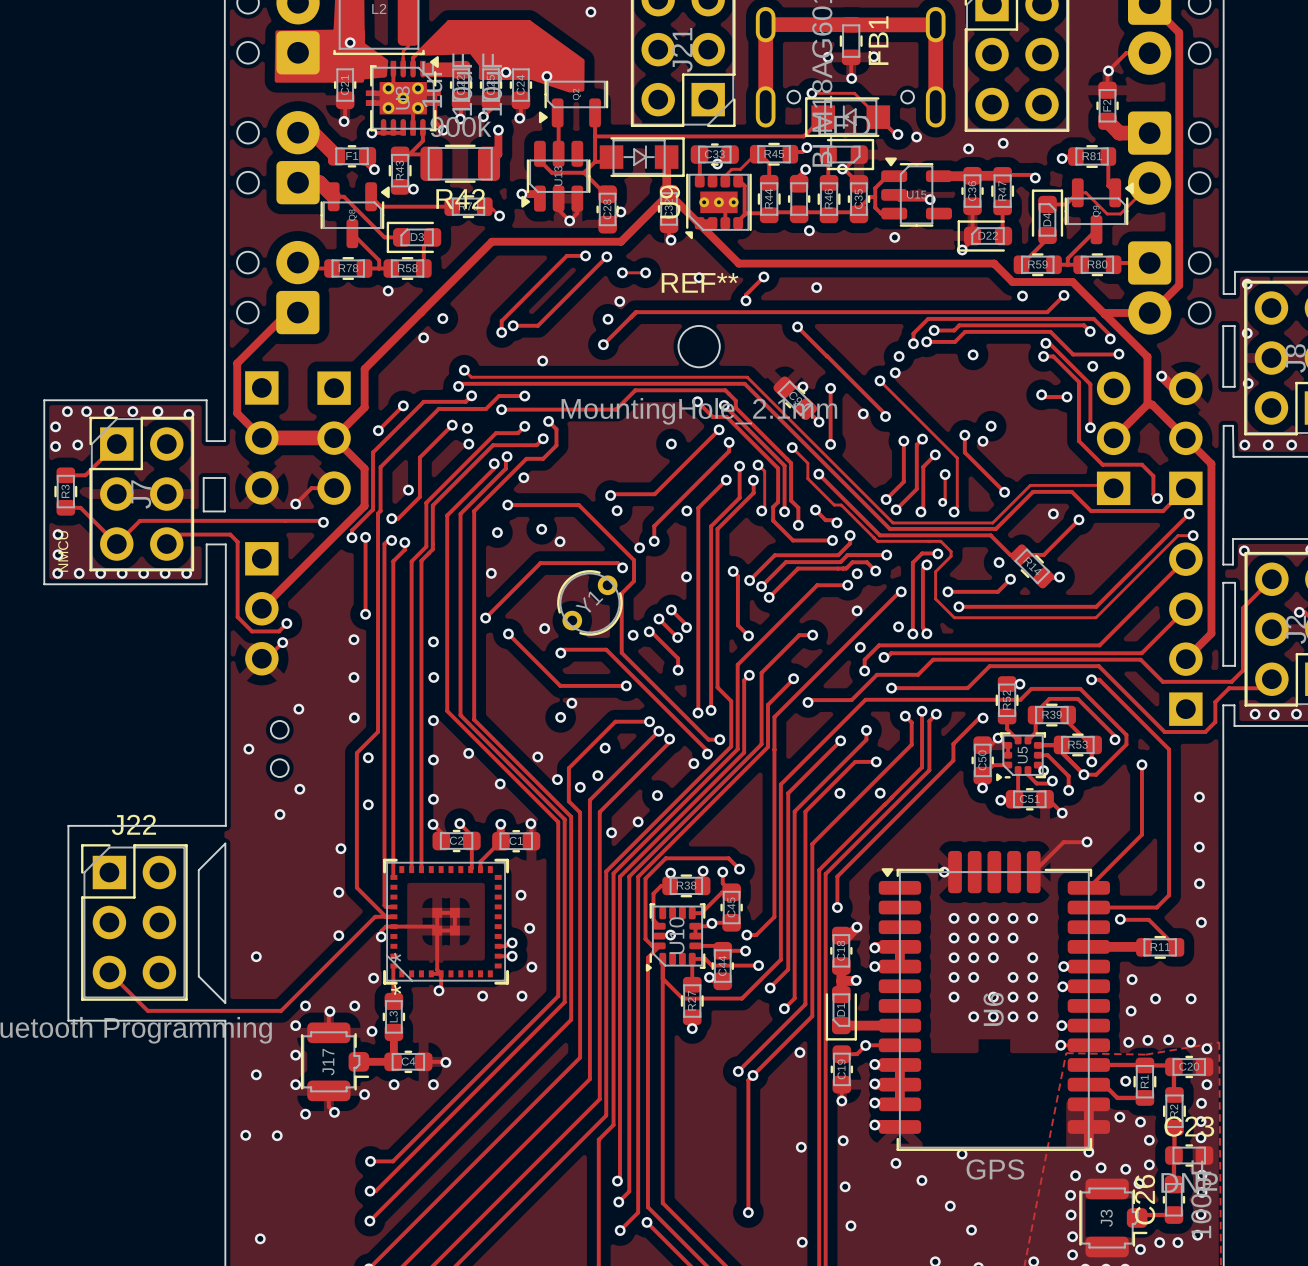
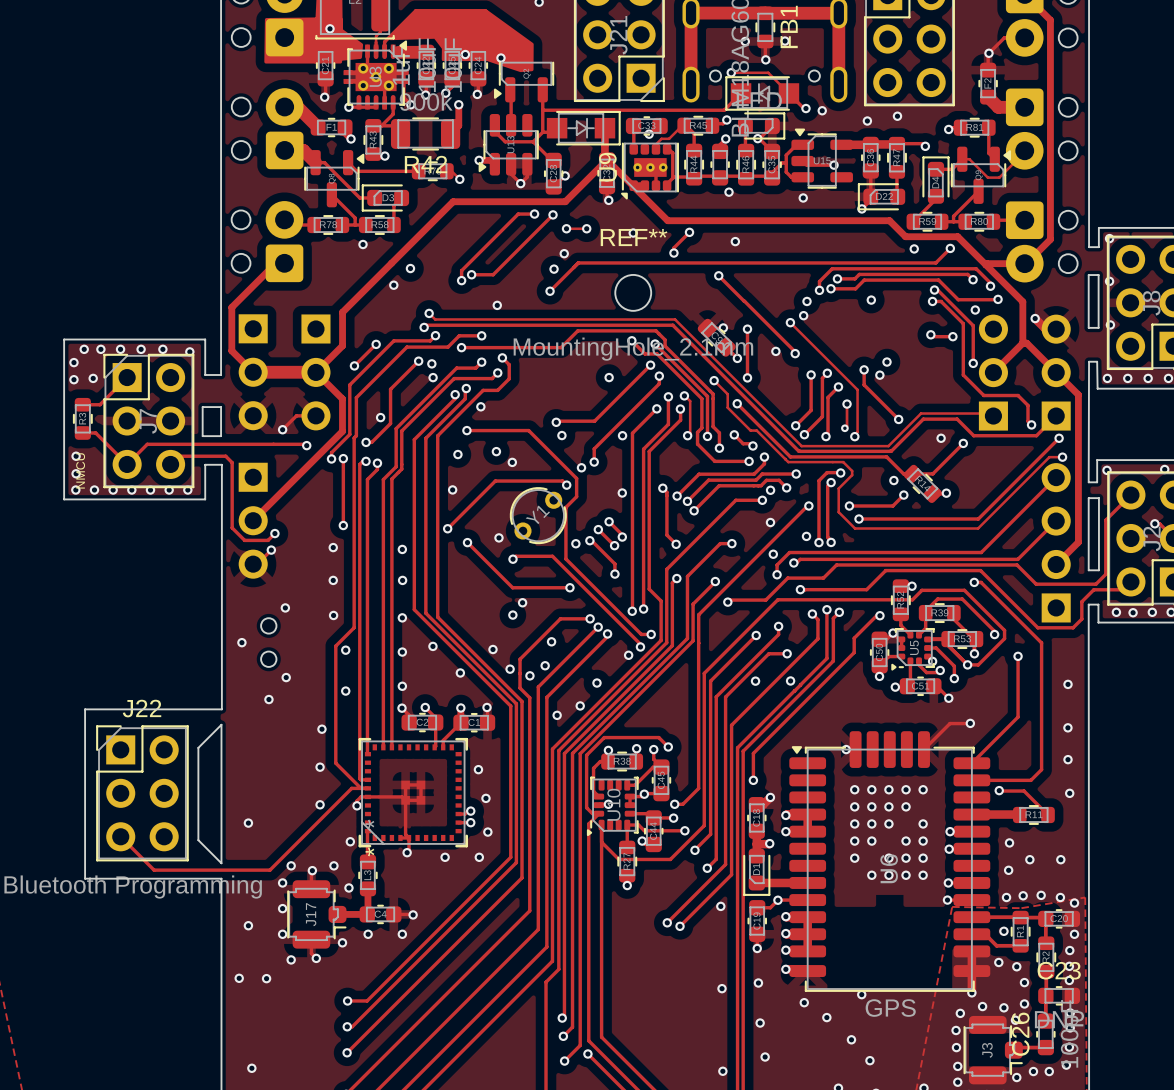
track: (752, 1075) (748, 1080) (748, 1212) -> none
via: (748, 1212) -> none

